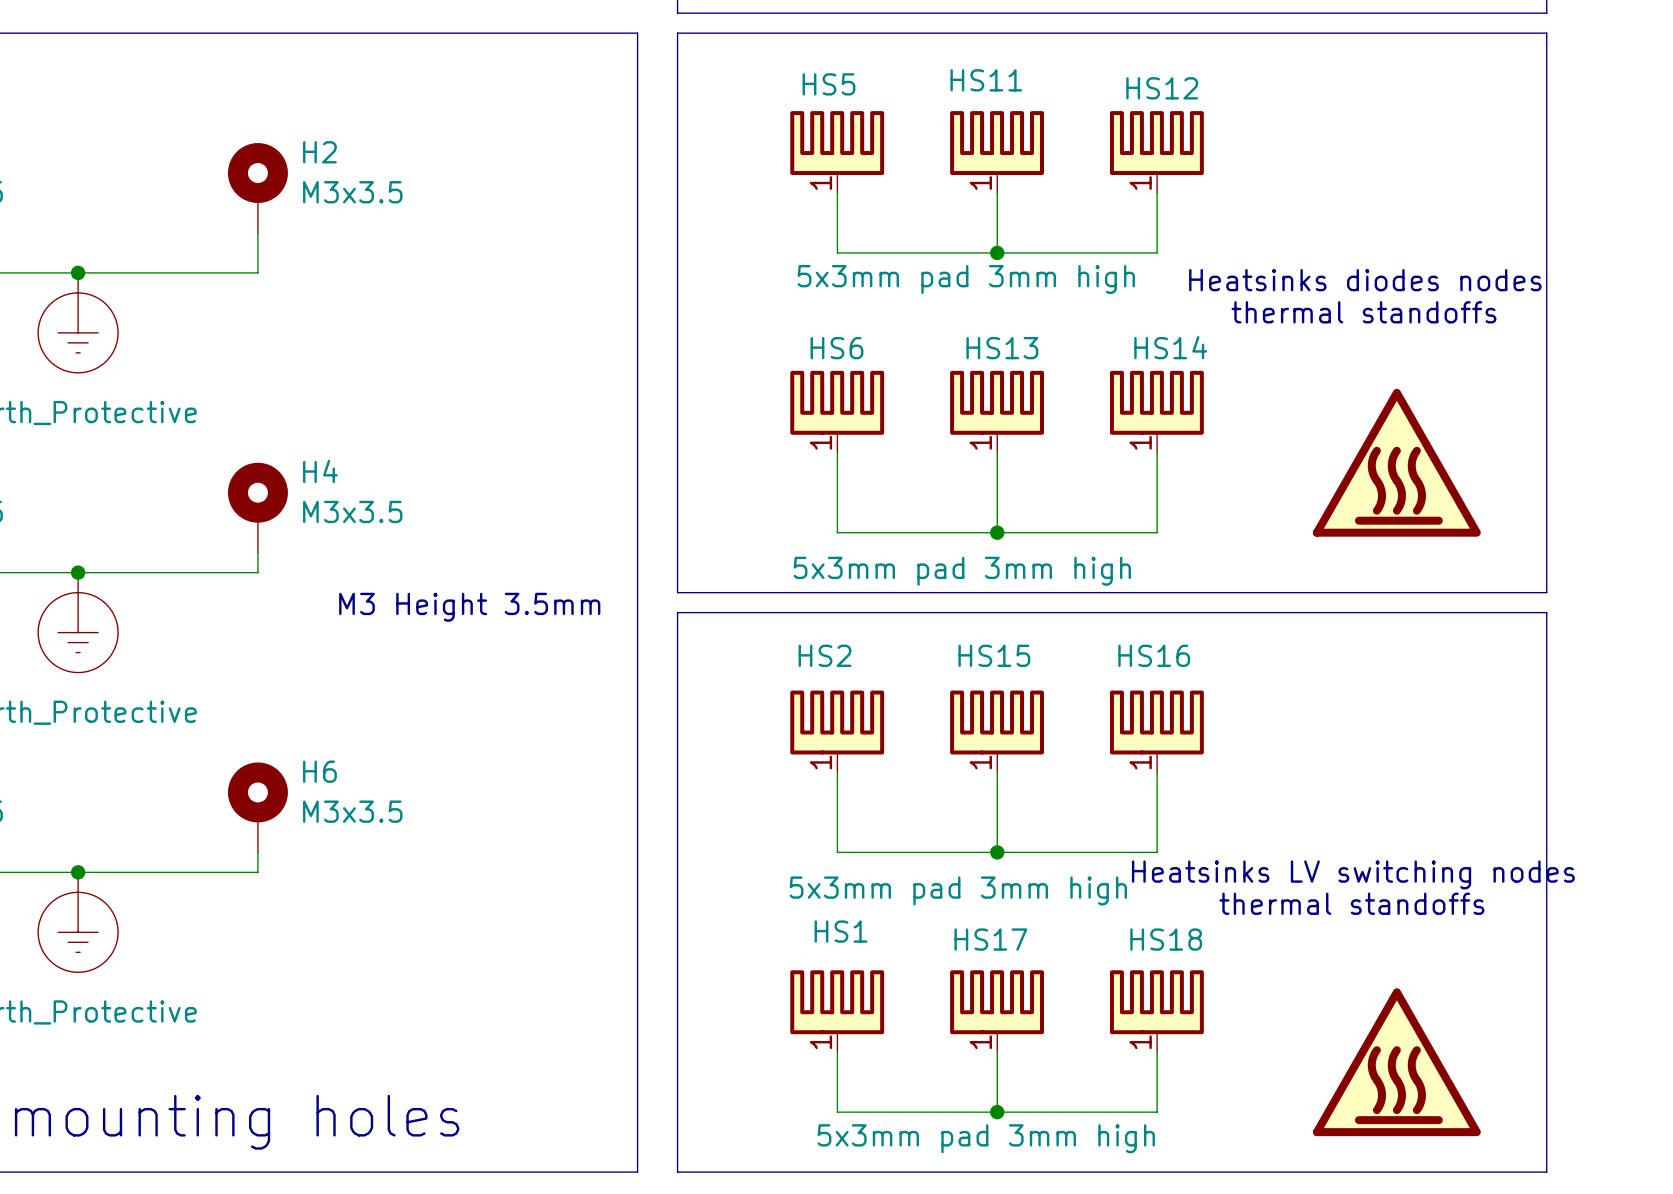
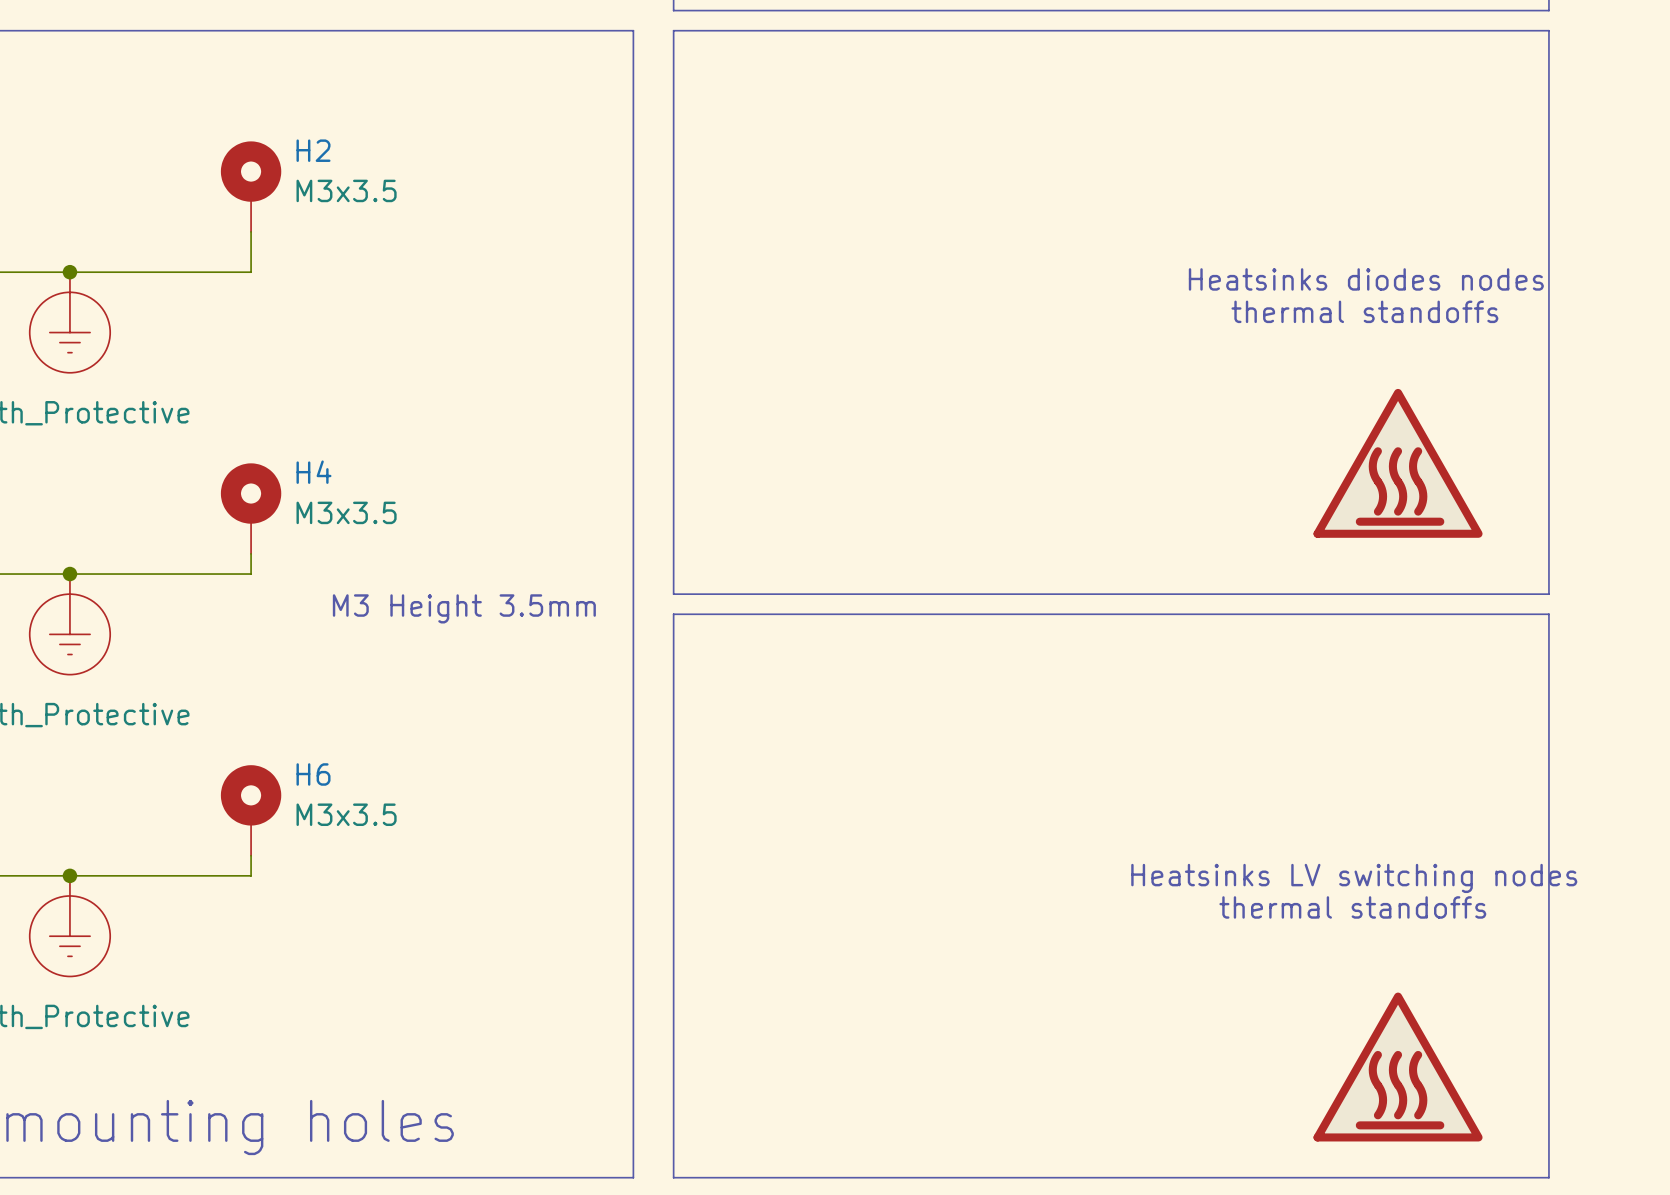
HS5: 5x3mm pad 3mm high (837, 152) -> none
HS11: (997, 152) -> none
HS12: (1156, 152) -> none
wire: (837, 193) (837, 252) (1157, 252) (1157, 193) -> none
wire: (997, 193) (997, 252) -> none
junction: (997, 252) -> none
HS6: 5x3mm pad 3mm high (837, 411) -> none
HS13: (997, 411) -> none
HS14: (1156, 411) -> none
wire: (837, 452) (837, 532) (1157, 532) (1157, 452) -> none
wire: (997, 452) (997, 532) -> none
junction: (997, 532) -> none
HS2: 5x3mm pad 3mm high (837, 731) -> none
HS15: (997, 731) -> none
HS16: (1156, 731) -> none
wire: (837, 772) (837, 852) (1157, 852) (1157, 772) -> none
wire: (997, 772) (997, 852) -> none
junction: (997, 852) -> none
HS1: 5x3mm pad 3mm high (837, 1011) -> none
HS17: (997, 1011) -> none
HS18: (1156, 1011) -> none
wire: (837, 1052) (837, 1112) (1157, 1112) (1157, 1052) -> none
wire: (997, 1052) (997, 1112) -> none
junction: (997, 1112) -> none

